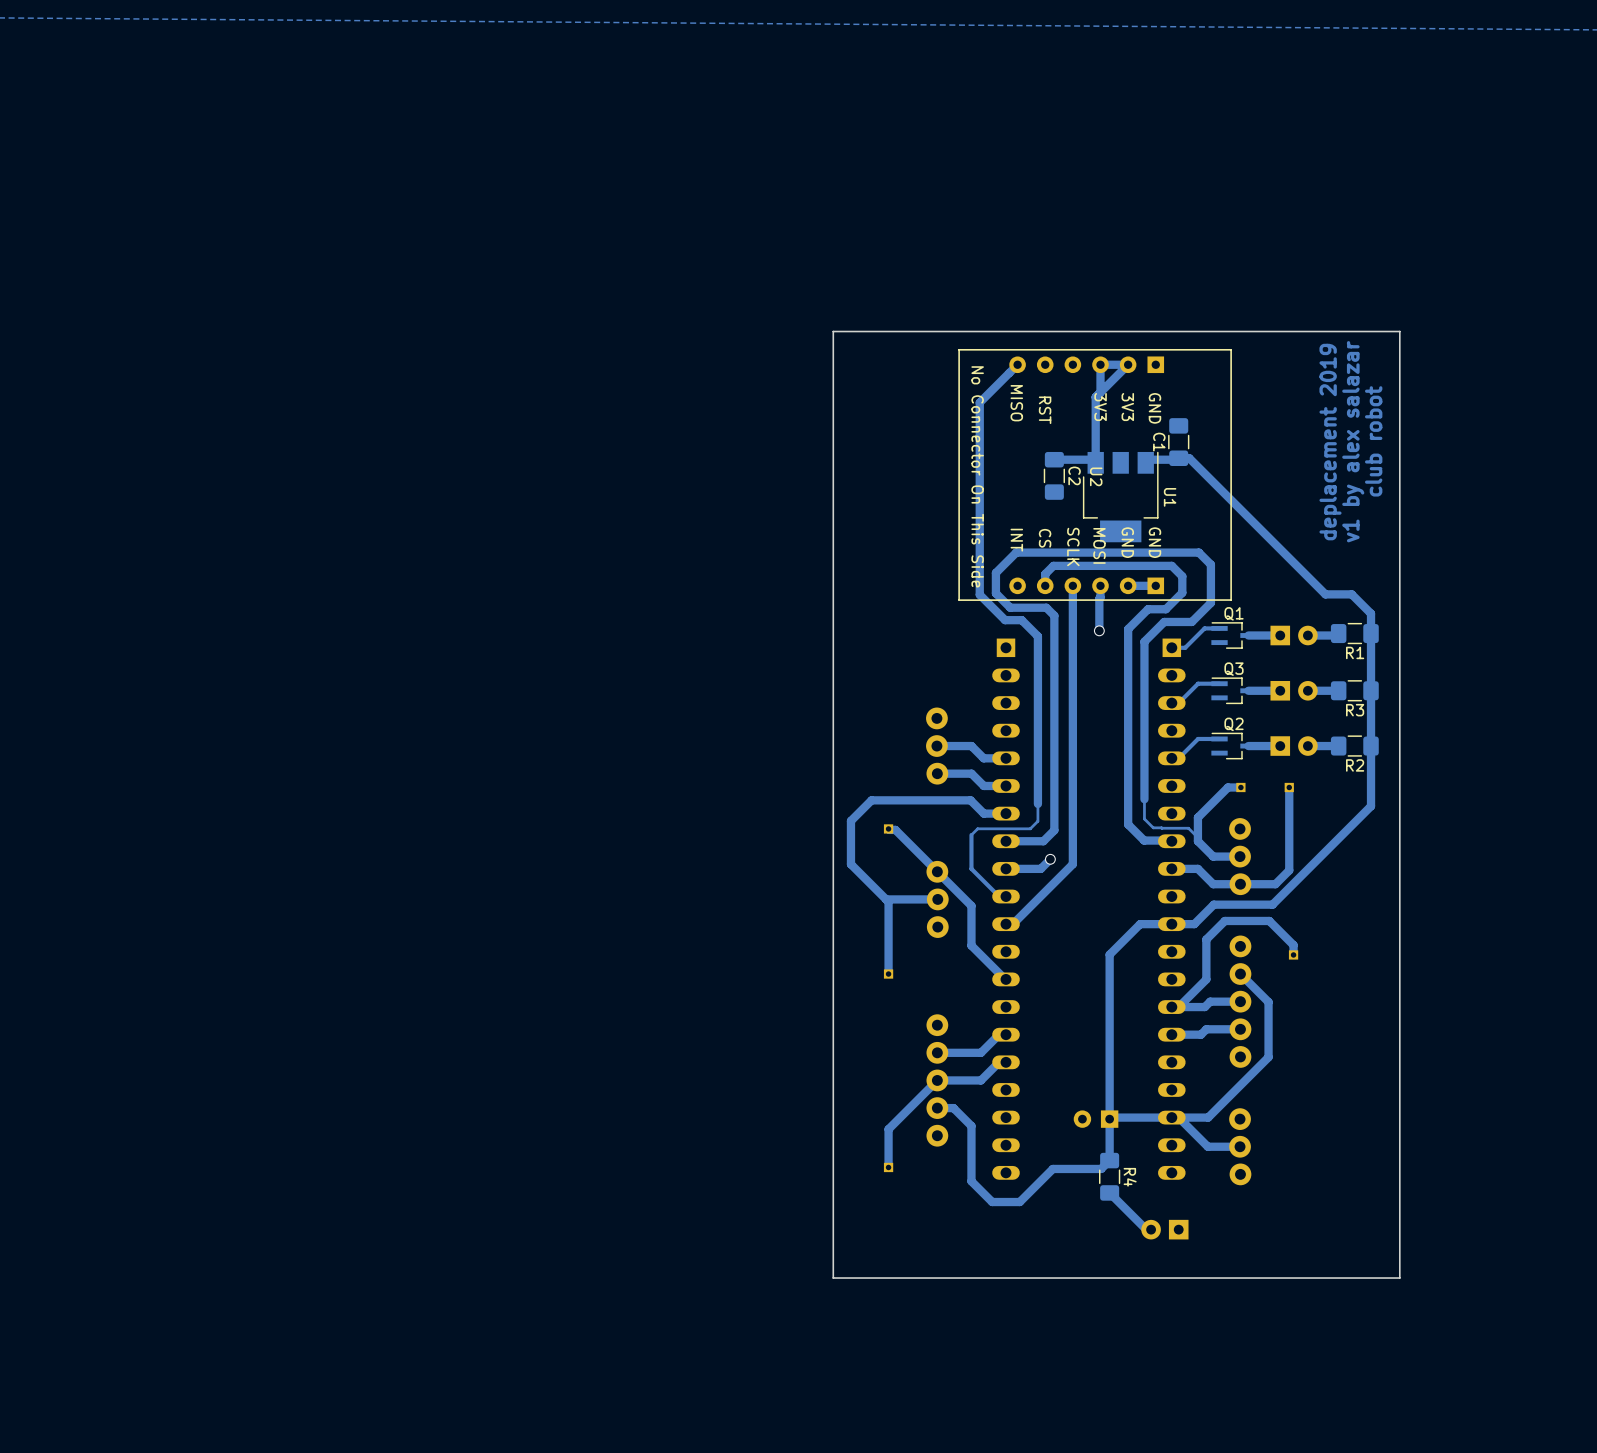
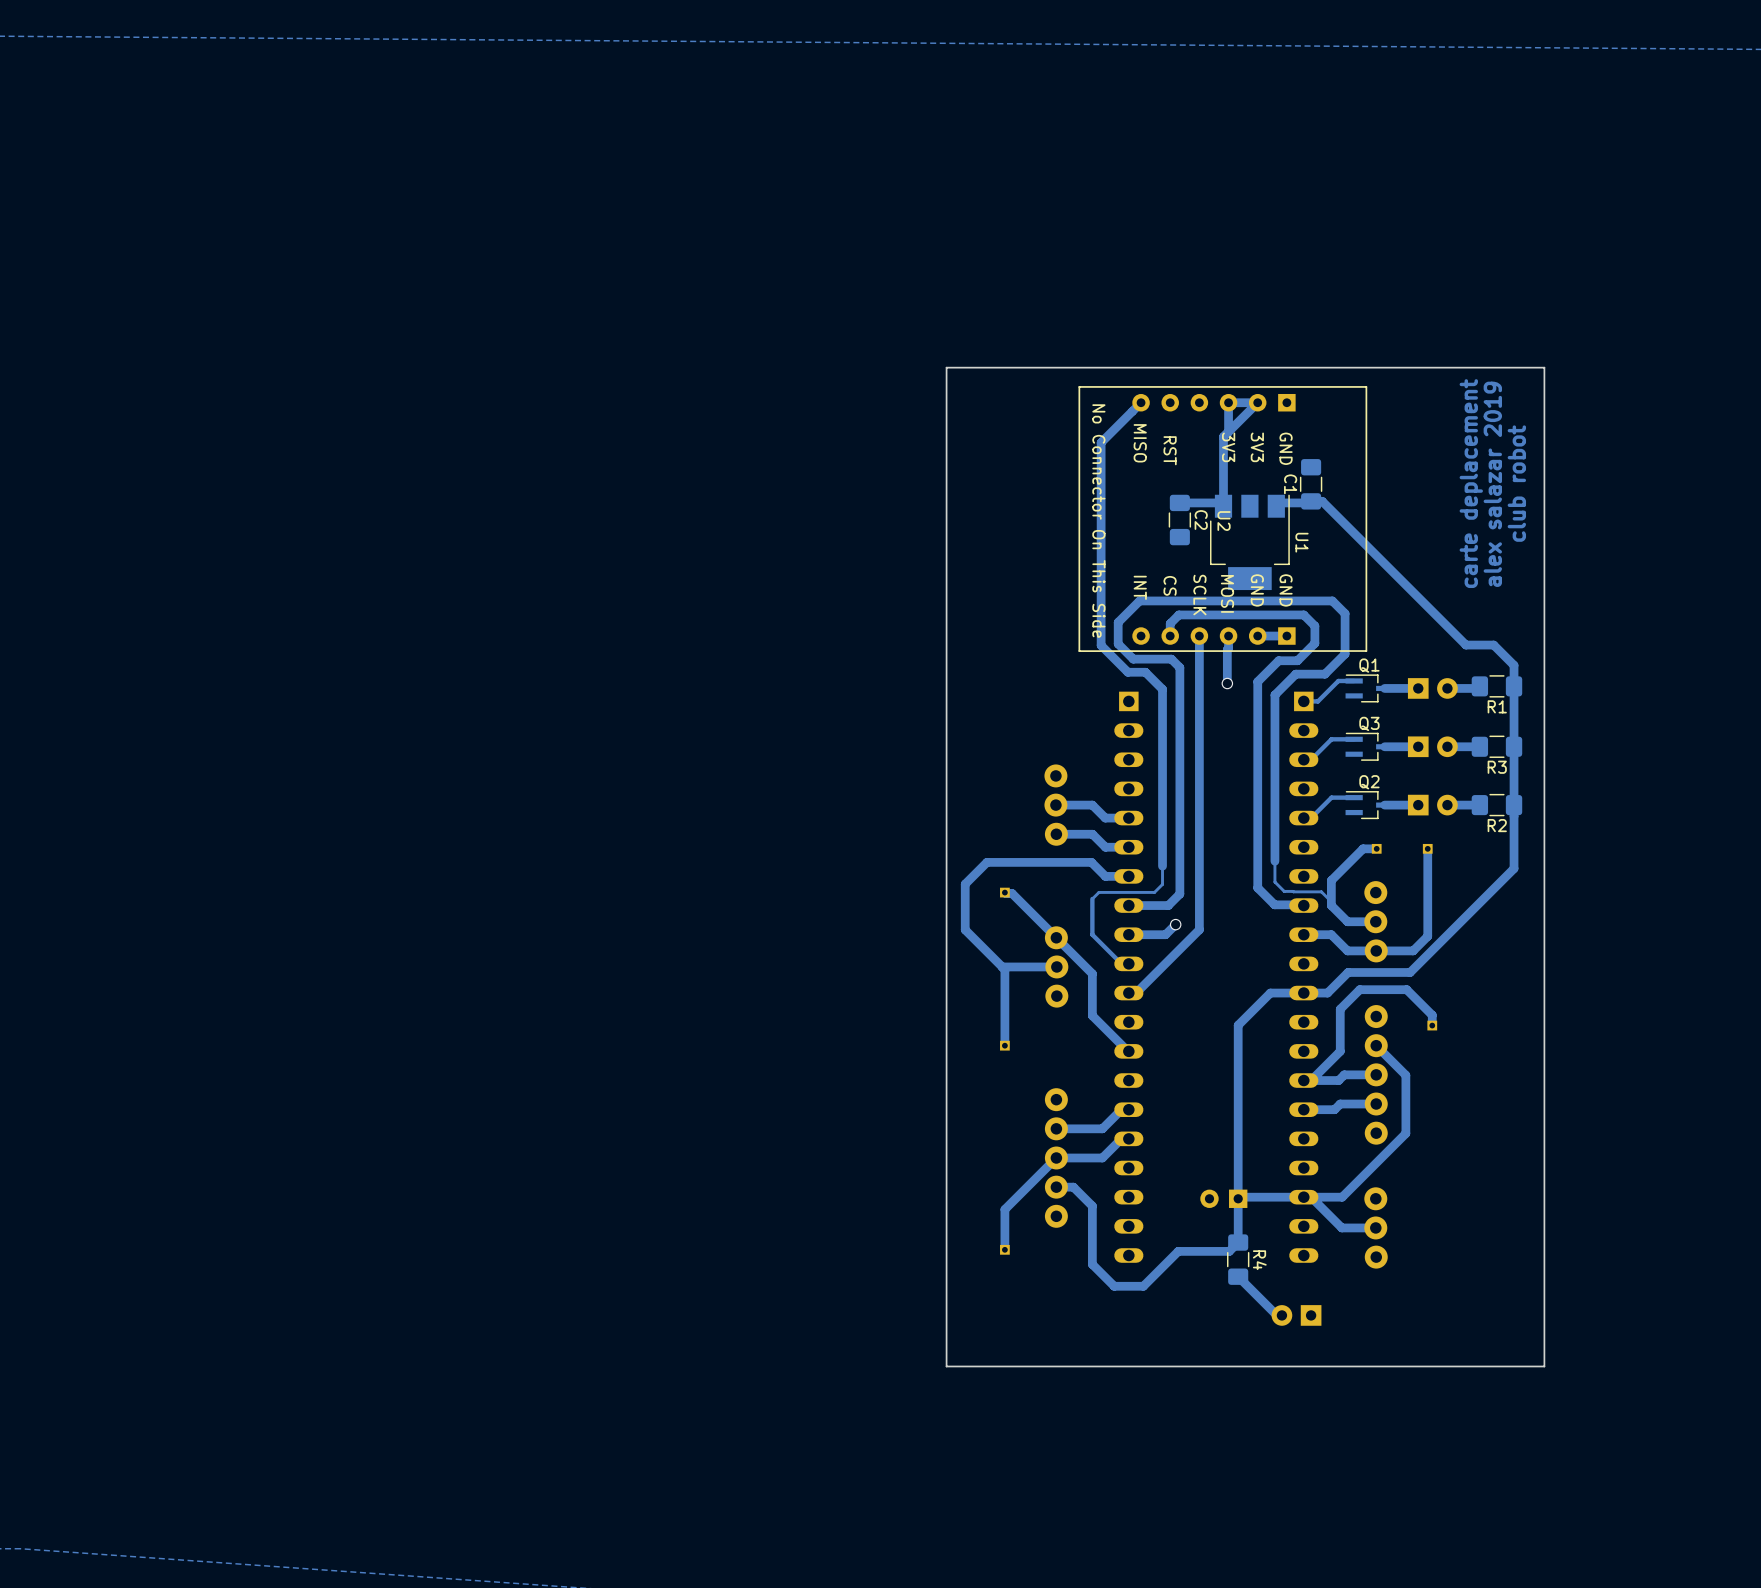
text: v1 by alex salazar (1353, 441) -> alex salazar 2019 (1492, 484)
text: deplacement 2019 (1330, 442) -> carte deplacement (1471, 483)

